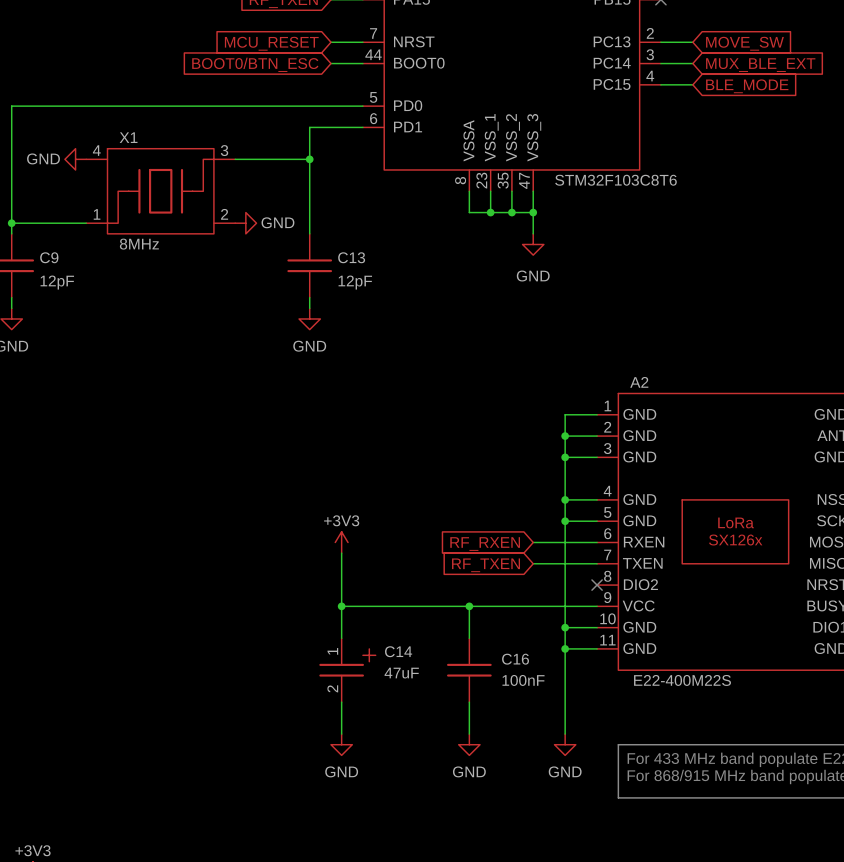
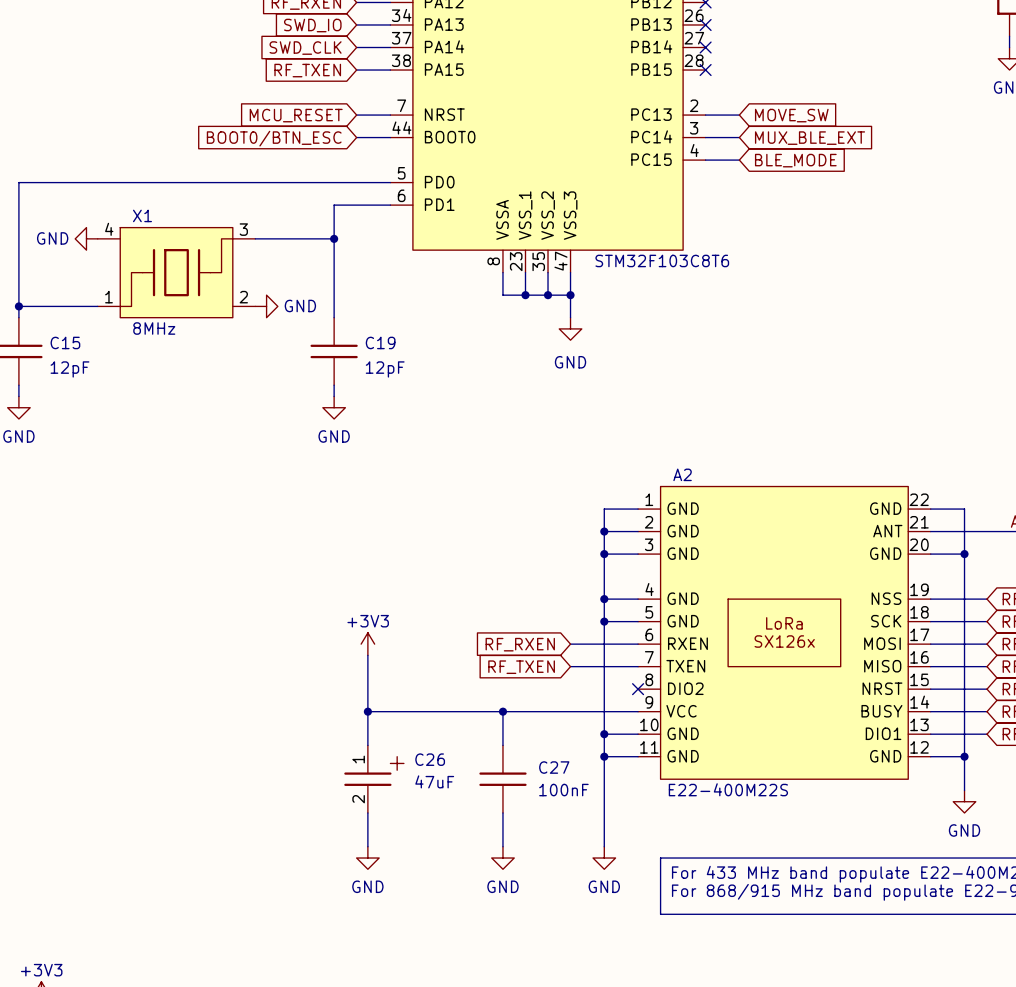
C9 name: C9 (49, 257) -> C15 (65, 342)
C13 name: C13 (351, 257) -> C19 (380, 342)
C14 name: C14 (398, 651) -> C26 (430, 759)
C16 name: C16 (515, 659) -> C27 (554, 767)

